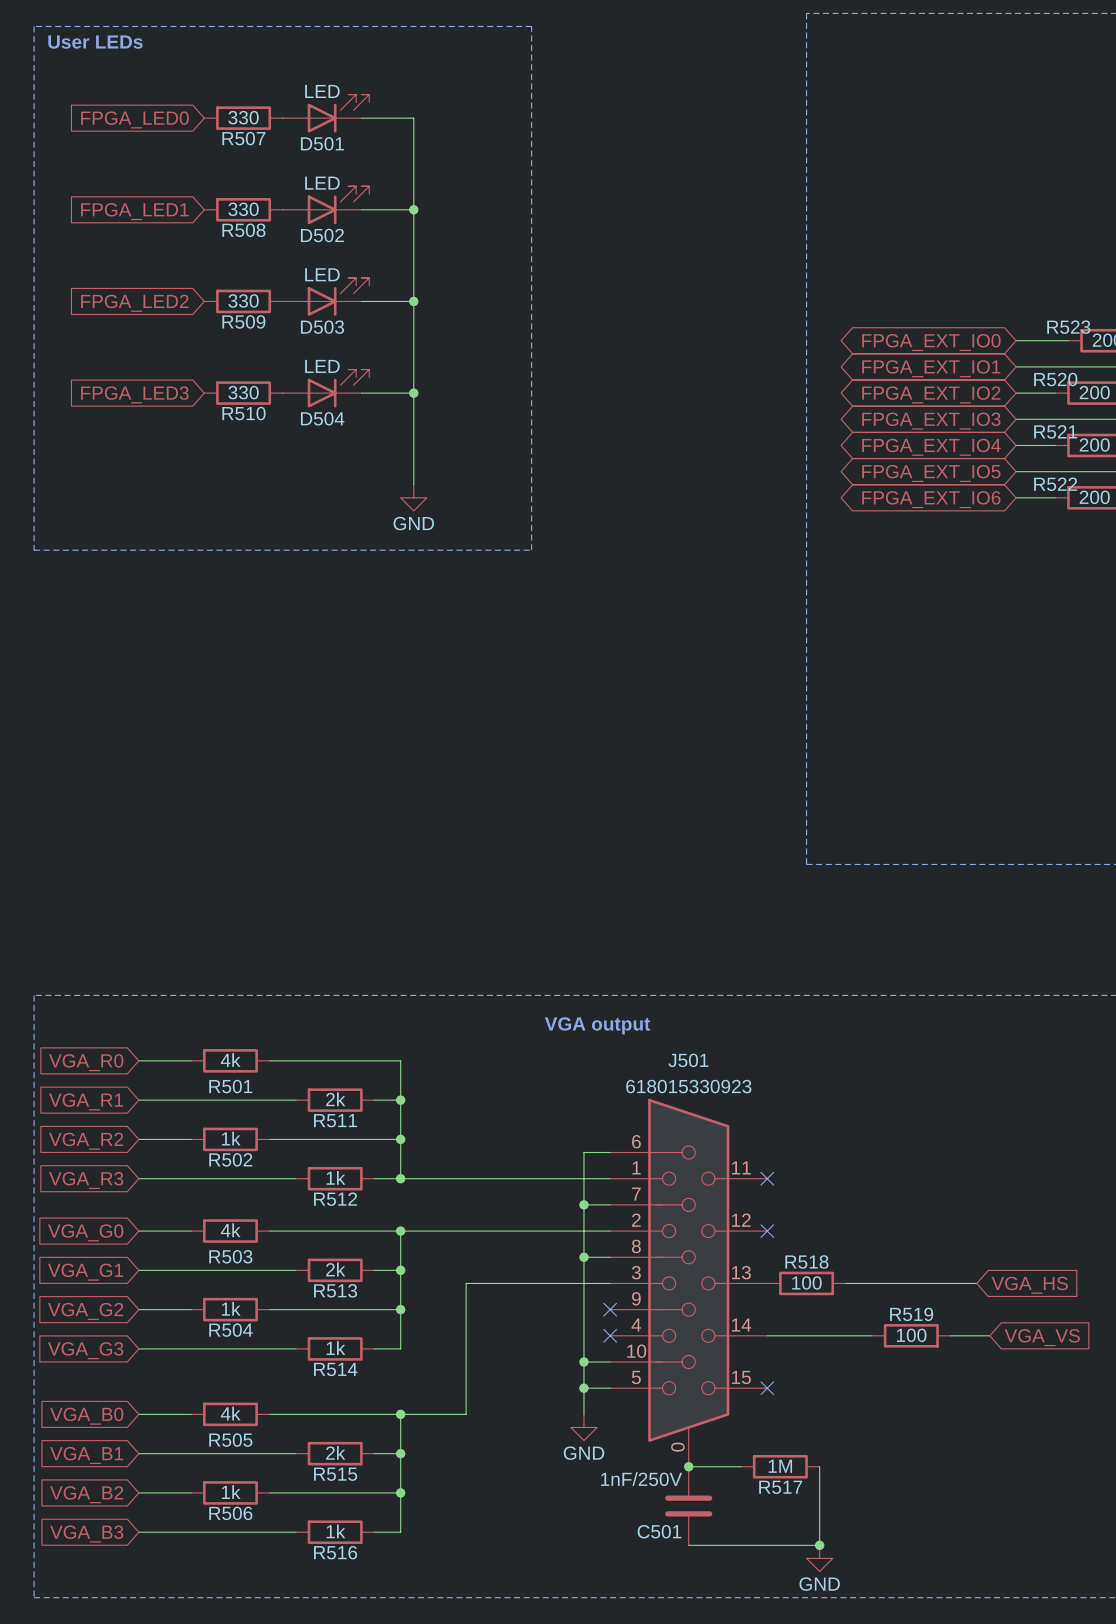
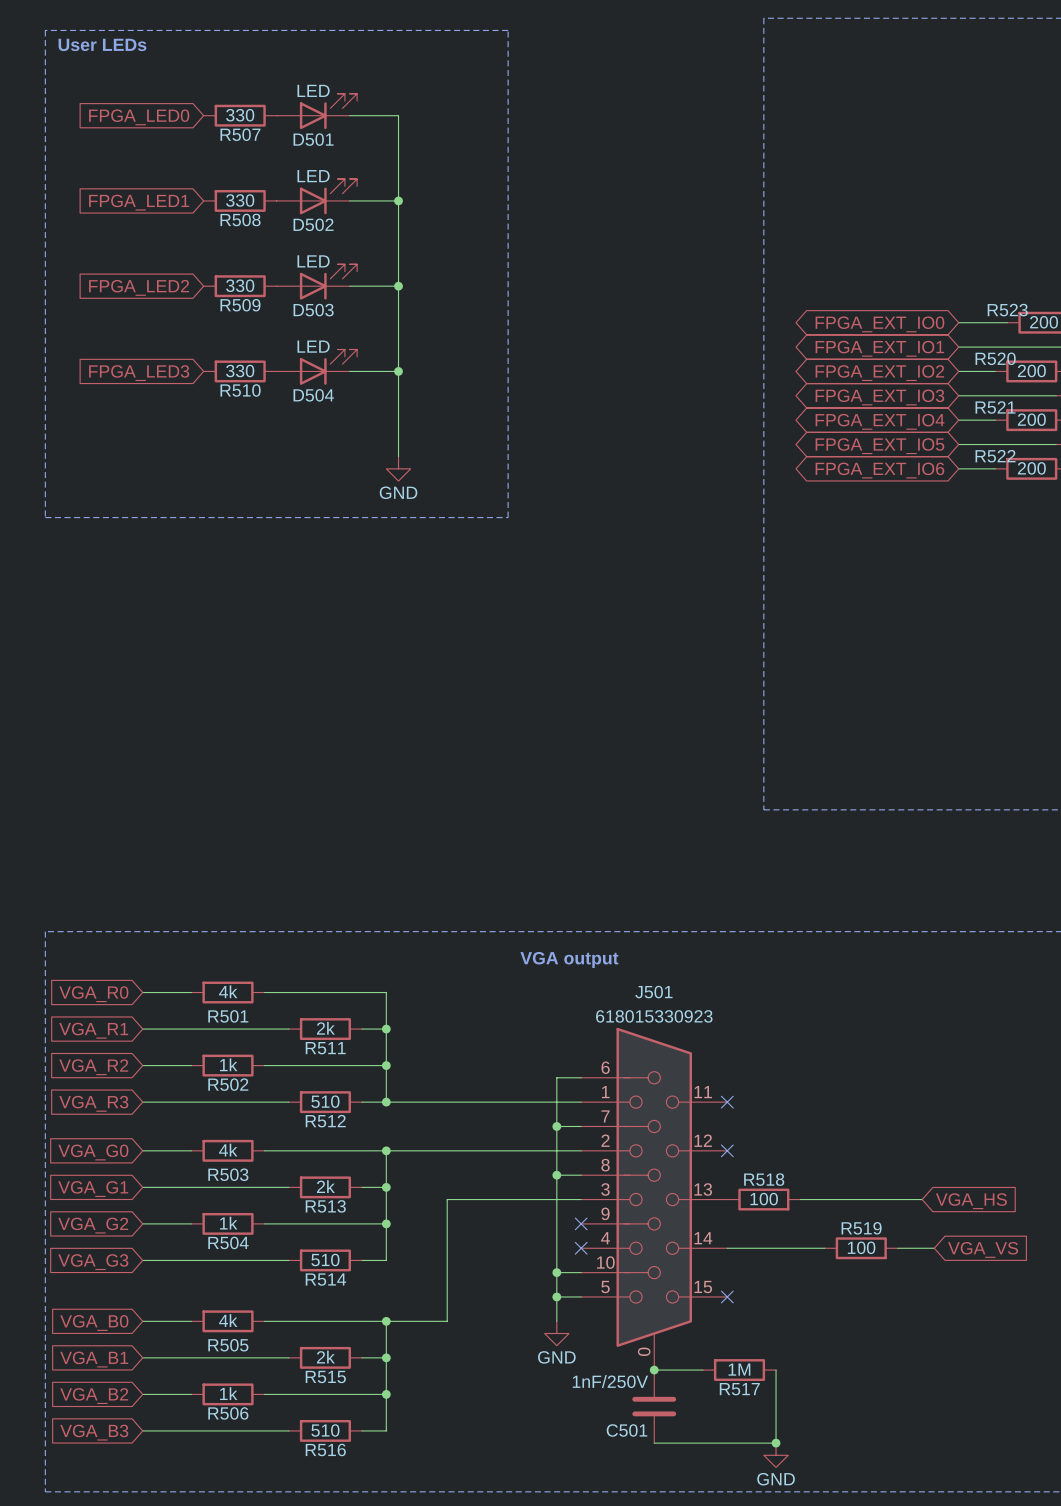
R512 value: 1k (335, 1177) -> 510 (325, 1101)
R514 value: 1k (335, 1348) -> 510 (325, 1259)
R516 value: 1k (335, 1531) -> 510 (325, 1430)

